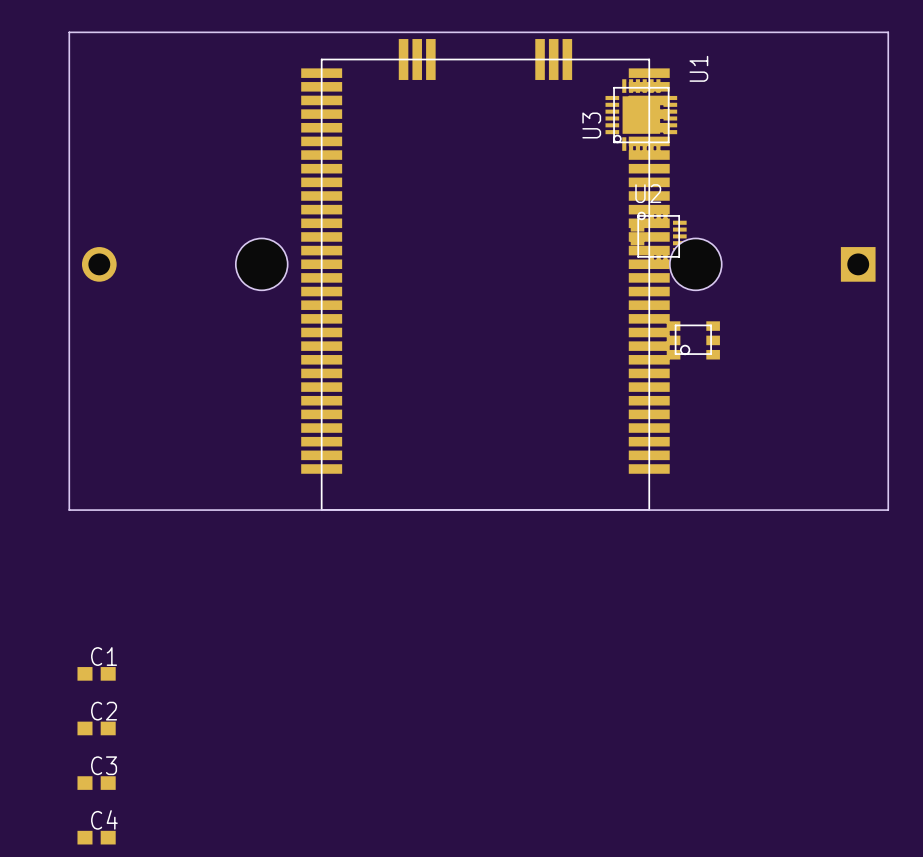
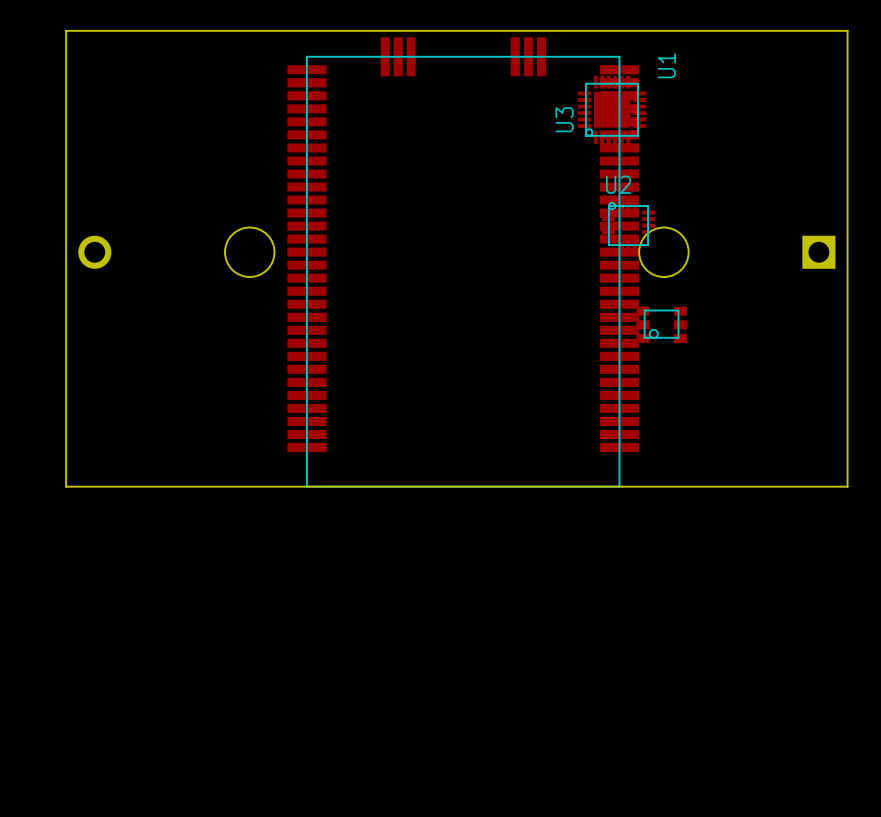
C1: (96, 673) -> none
C2: (96, 728) -> none
C3: (96, 783) -> none
C4: (96, 837) -> none

